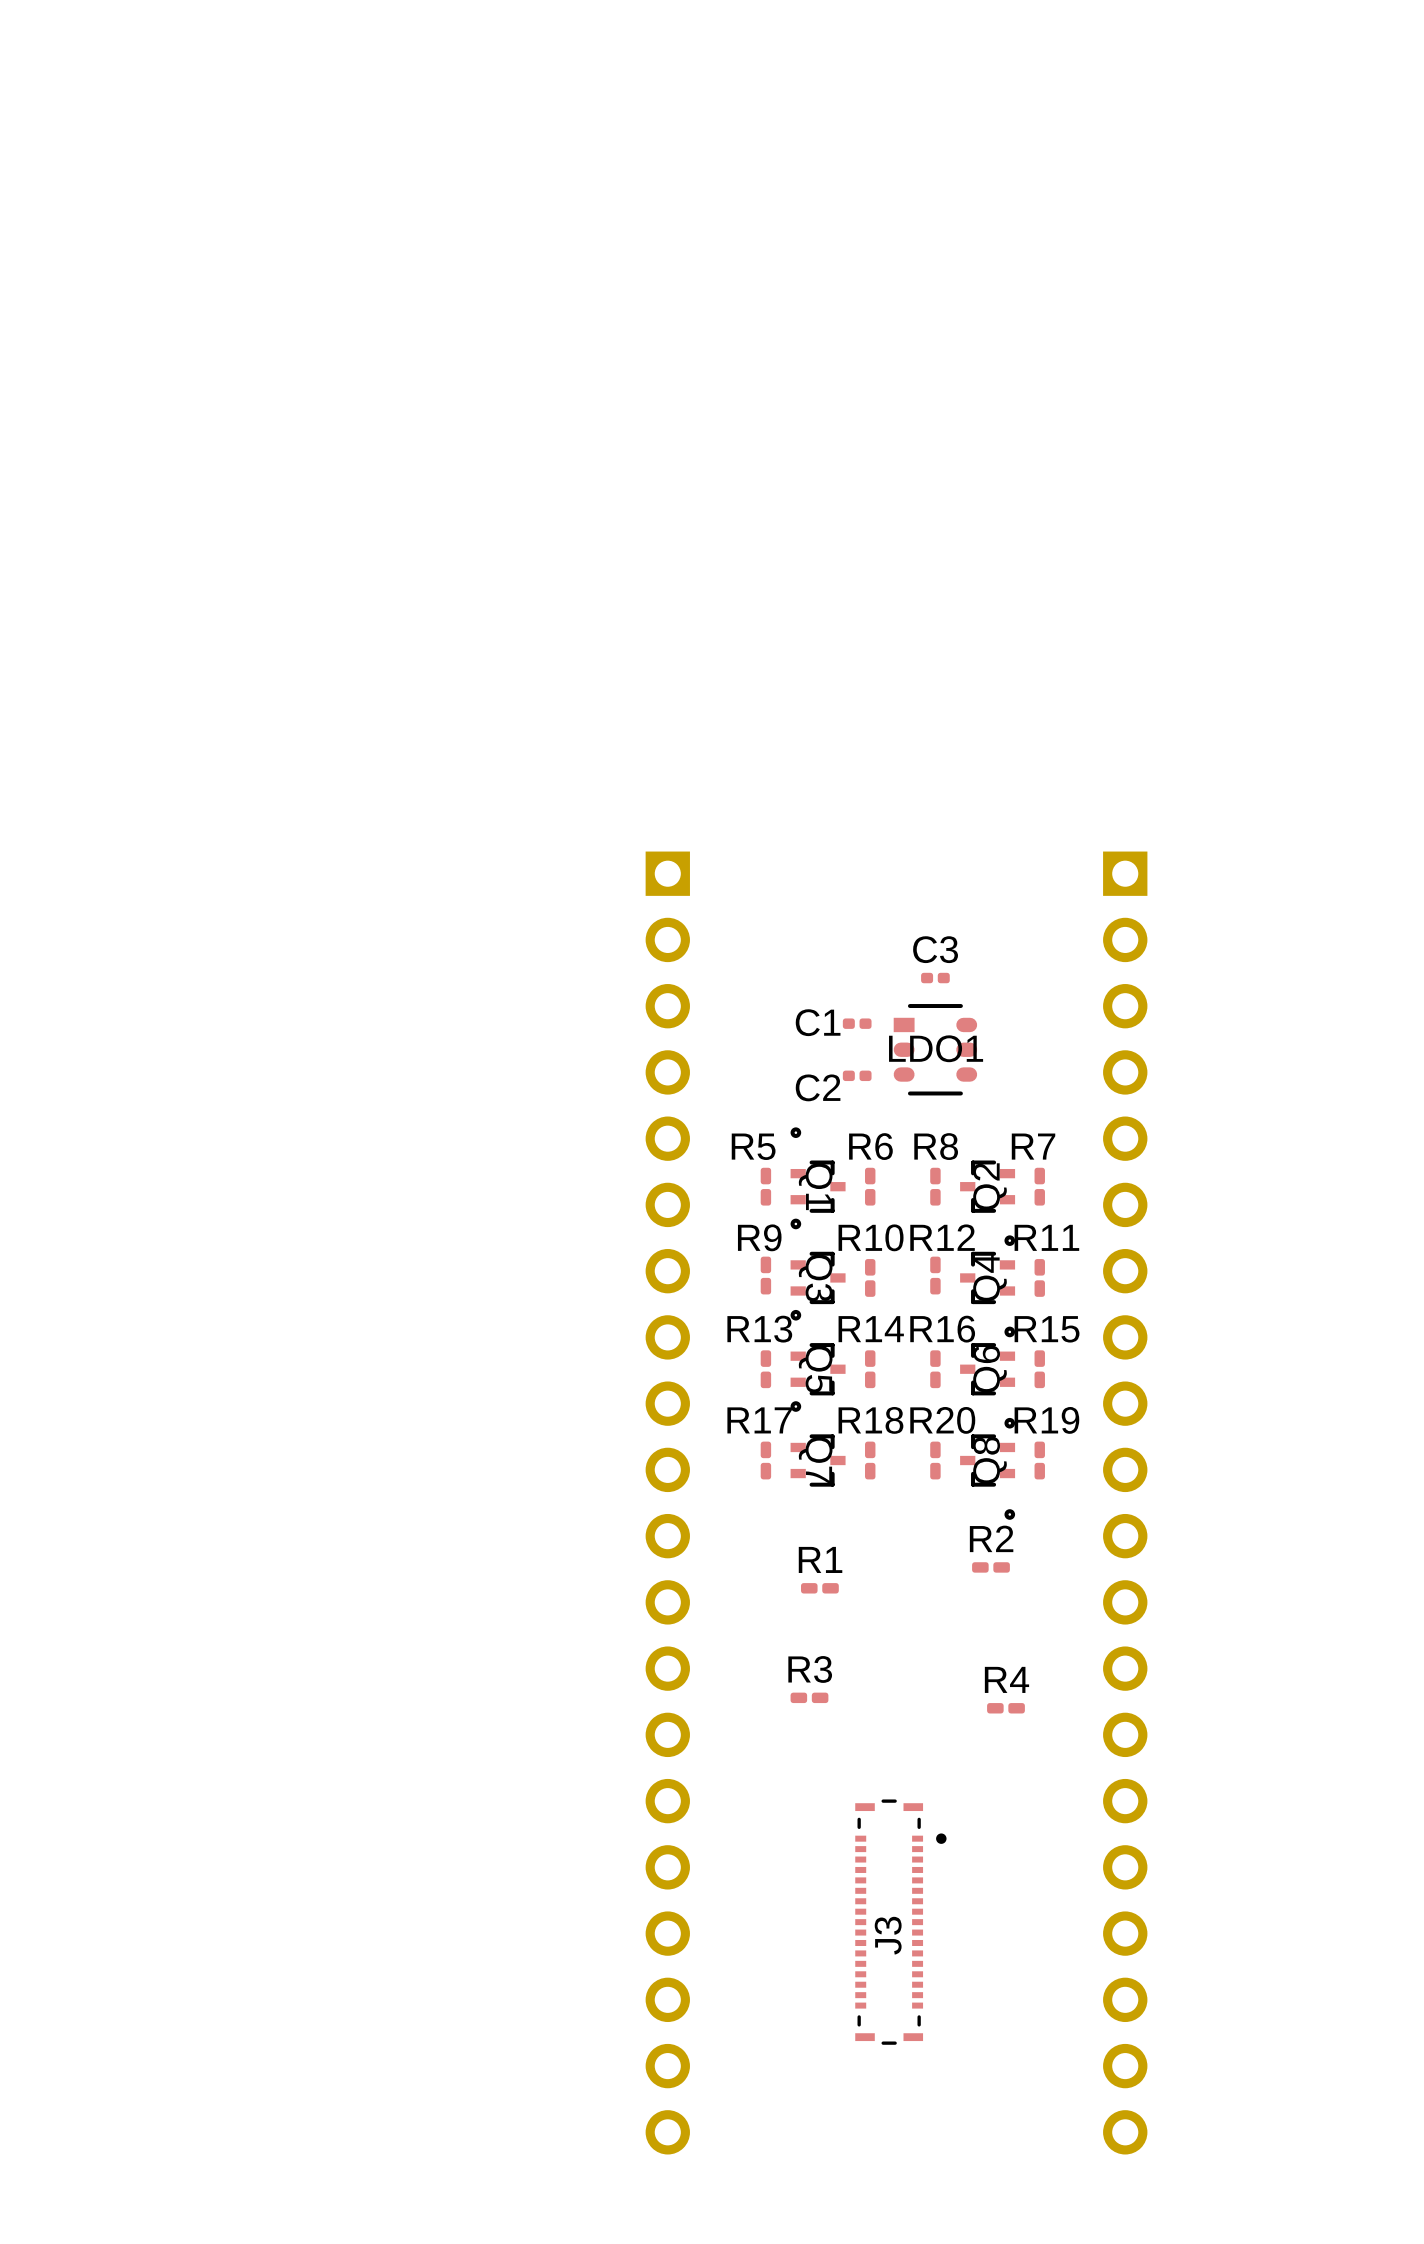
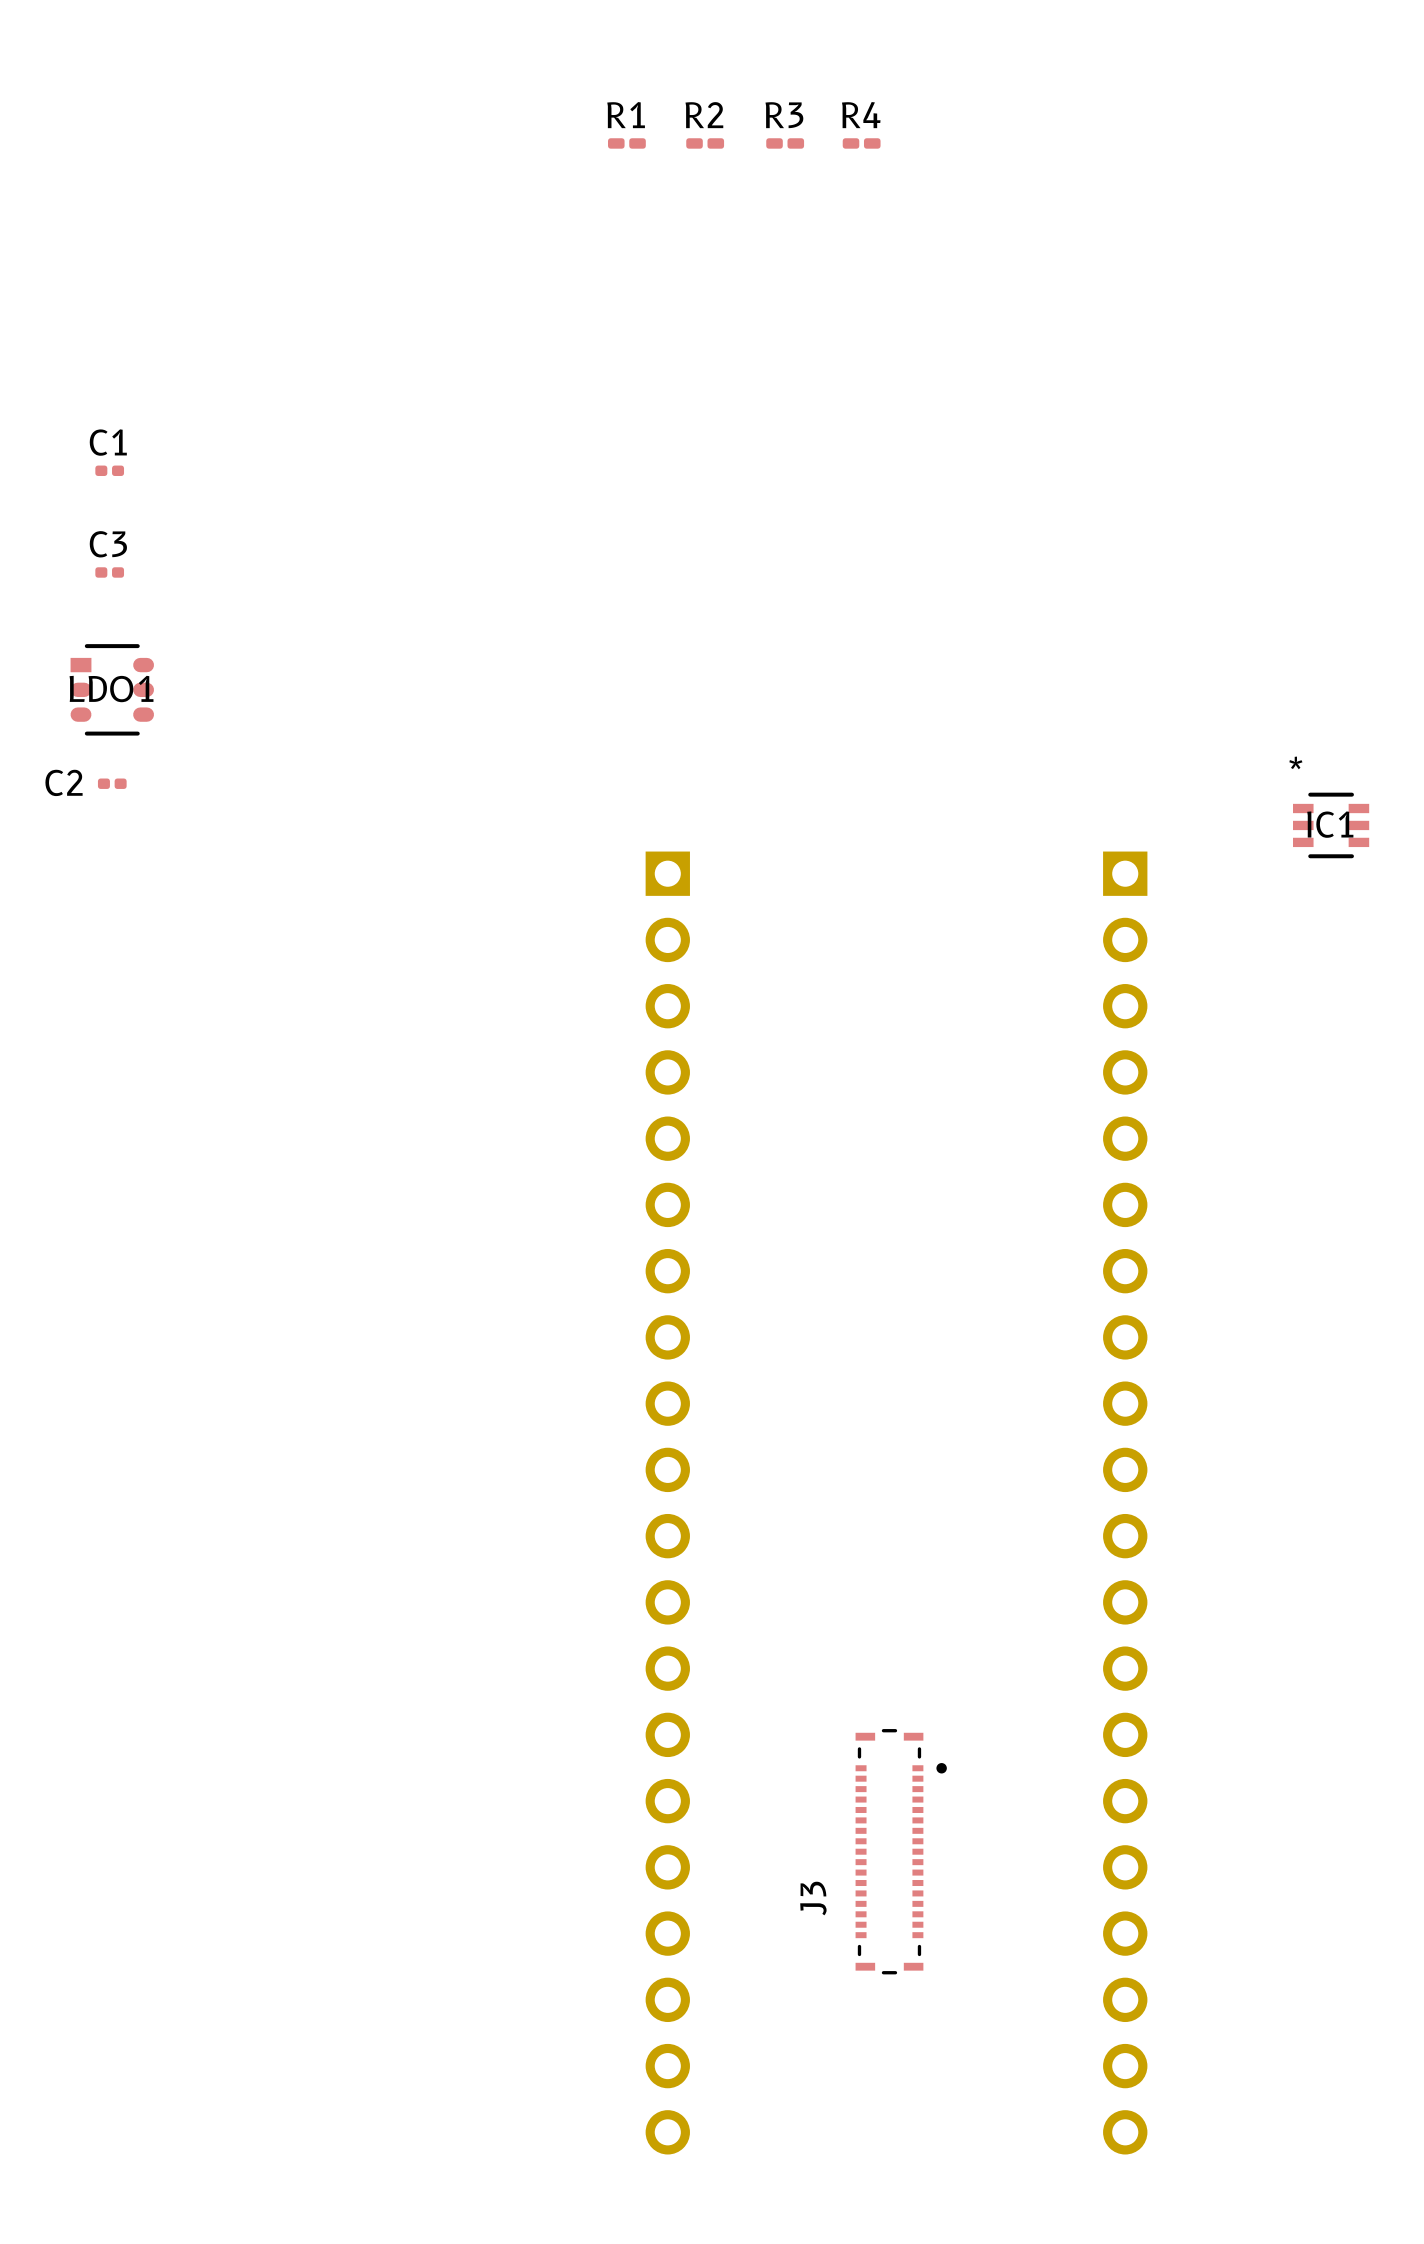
IC1: none -> (1331, 825)
C3 position: (935, 978) -> (109, 572)
C1 name position: C1 (818, 1022) -> C1 (108, 442)
C1 position: (857, 1023) -> (109, 470)
LDO1 position: (935, 1049) -> (112, 689)
C2 position: (857, 1075) -> (112, 783)
C2 name position: C2 (818, 1087) -> C2 (64, 782)
Q1: (818, 1170) -> none
R5: (765, 1186) -> none
R6: (870, 1186) -> none
R8: (935, 1186) -> none
R7: (1039, 1186) -> none
Q2: (987, 1203) -> none
Q3: (818, 1261) -> none
R9: (765, 1275) -> none
R12: (935, 1275) -> none
R10: (870, 1277) -> none
R11: (1039, 1277) -> none
Q4: (987, 1294) -> none
Q5: (818, 1352) -> none
R13: (765, 1369) -> none
R14: (870, 1369) -> none
R16: (935, 1369) -> none
R15: (1039, 1369) -> none
Q6: (987, 1385) -> none
Q7: (818, 1443) -> none
R17: (765, 1460) -> none
R18: (870, 1460) -> none
R20: (935, 1460) -> none
R19: (1039, 1460) -> none
Q8: (987, 1477) -> none
R2 position: (990, 1567) -> (705, 143)
R1 position: (819, 1588) -> (626, 143)
R3 position: (809, 1697) -> (785, 143)
R4 position: (1005, 1708) -> (861, 143)
J3 position: (900, 1922) -> (901, 1851)
J3 name position: J3 (888, 1935) -> J3 (813, 1898)

